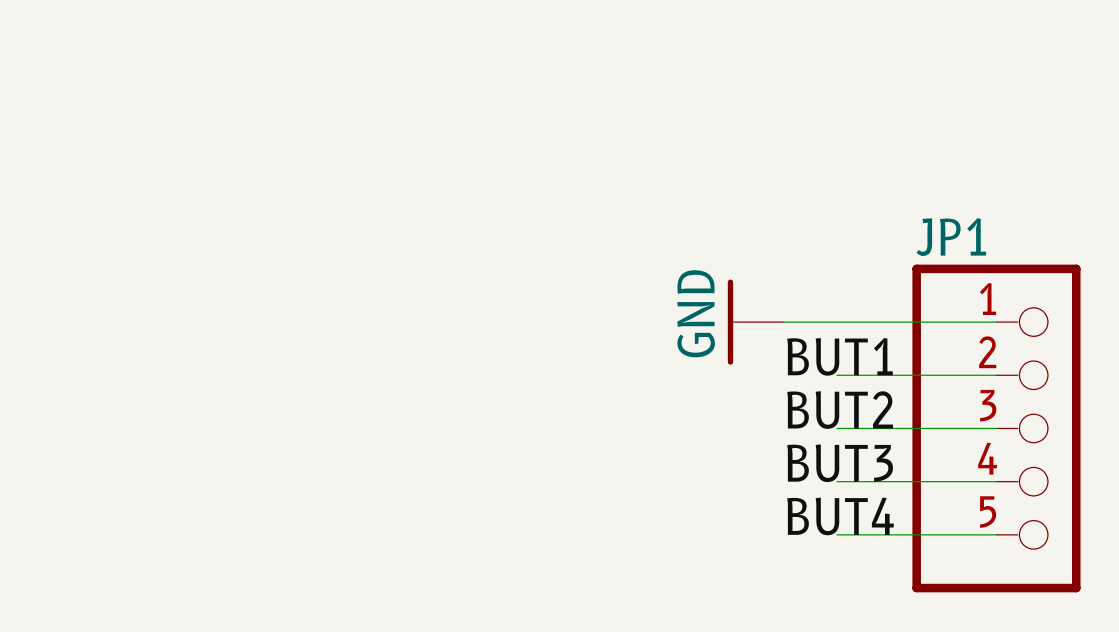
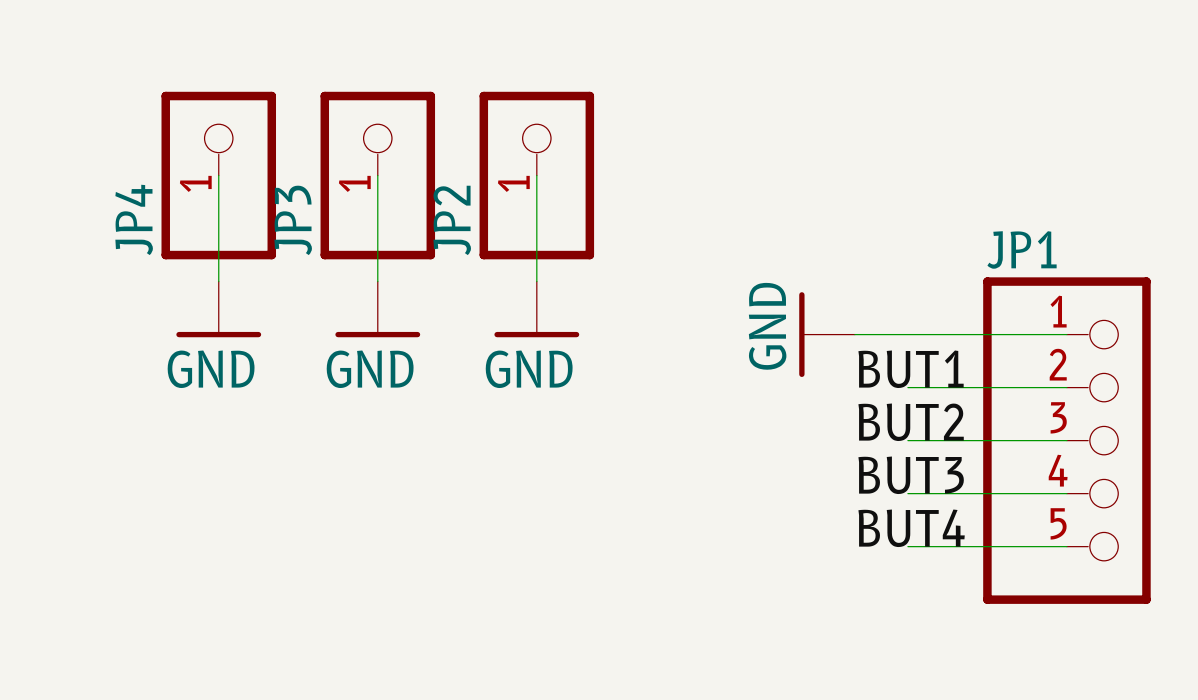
wire: none -> (218, 175) (218, 281)
JP4: none -> (218, 175)
wire: none -> (377, 175) (377, 281)
JP3: none -> (377, 175)
wire: none -> (536, 175) (536, 281)
JP2: none -> (536, 175)
power symbol: none -> GND (218, 309)
power symbol: none -> GND (377, 309)
power symbol: none -> GND (536, 309)

